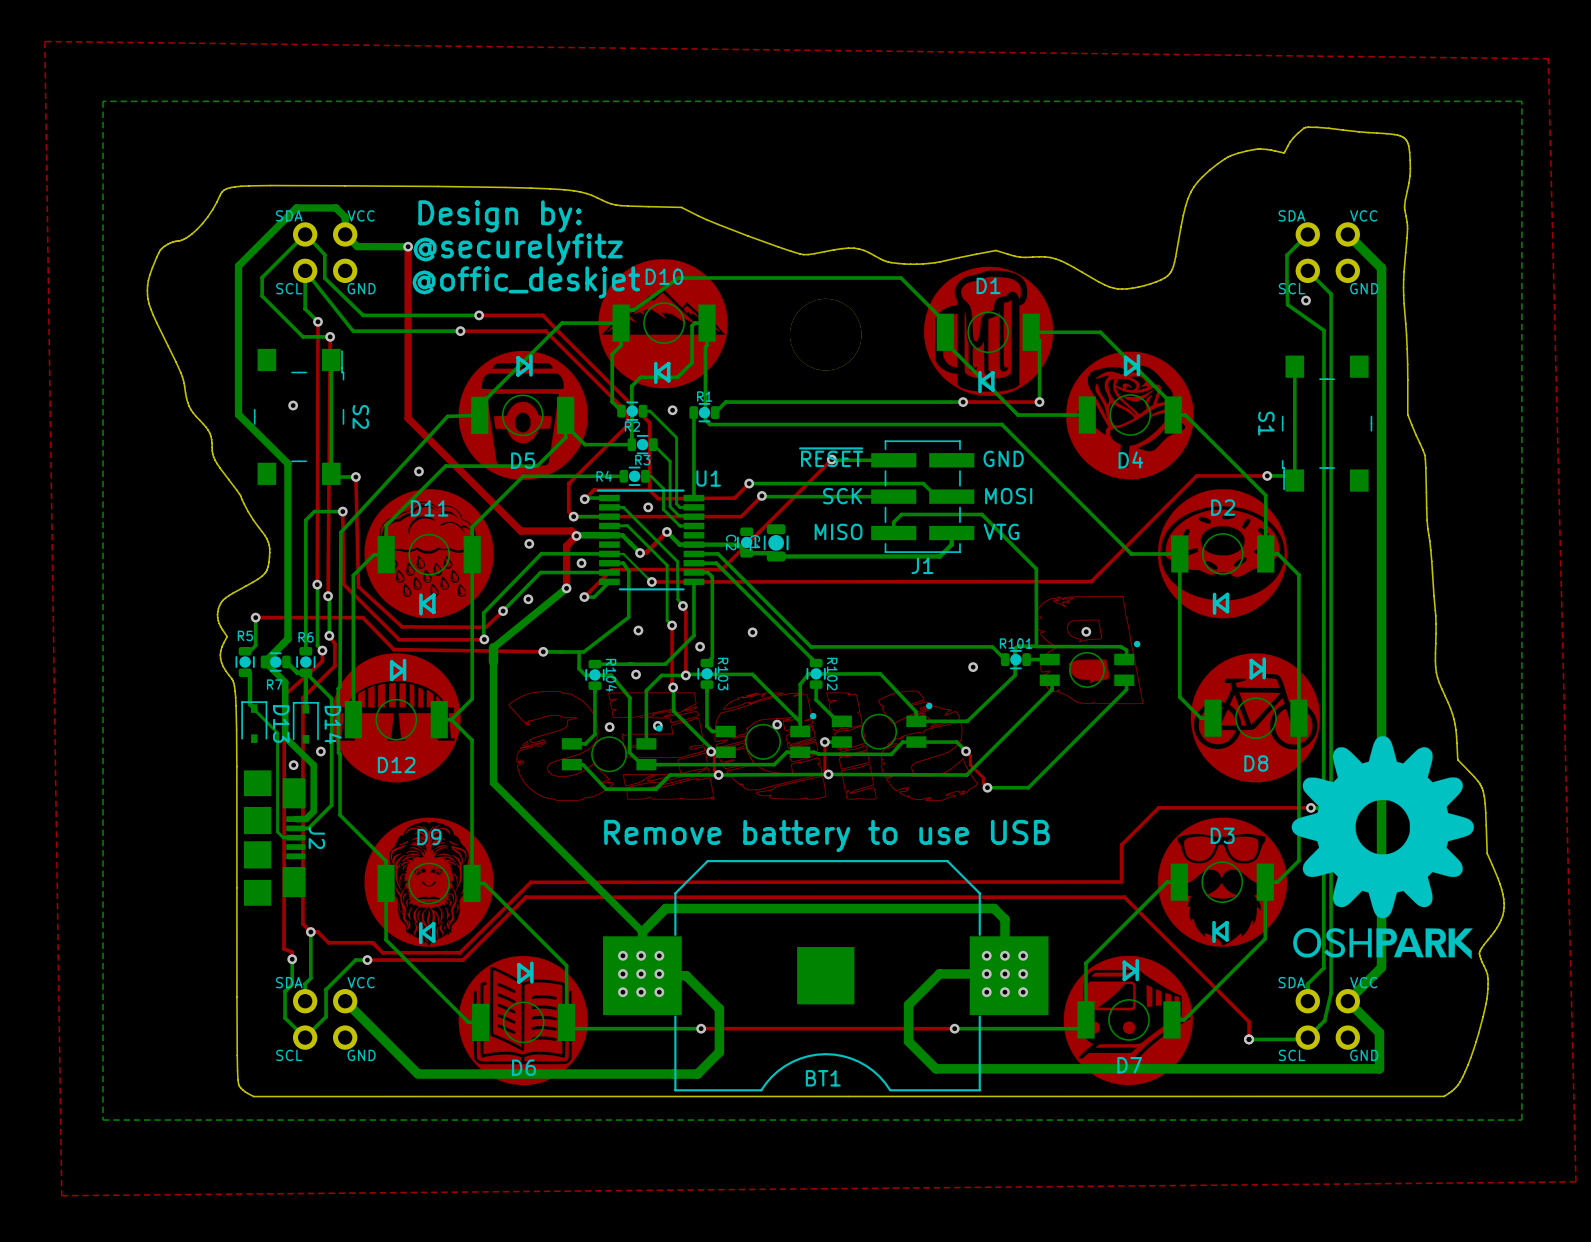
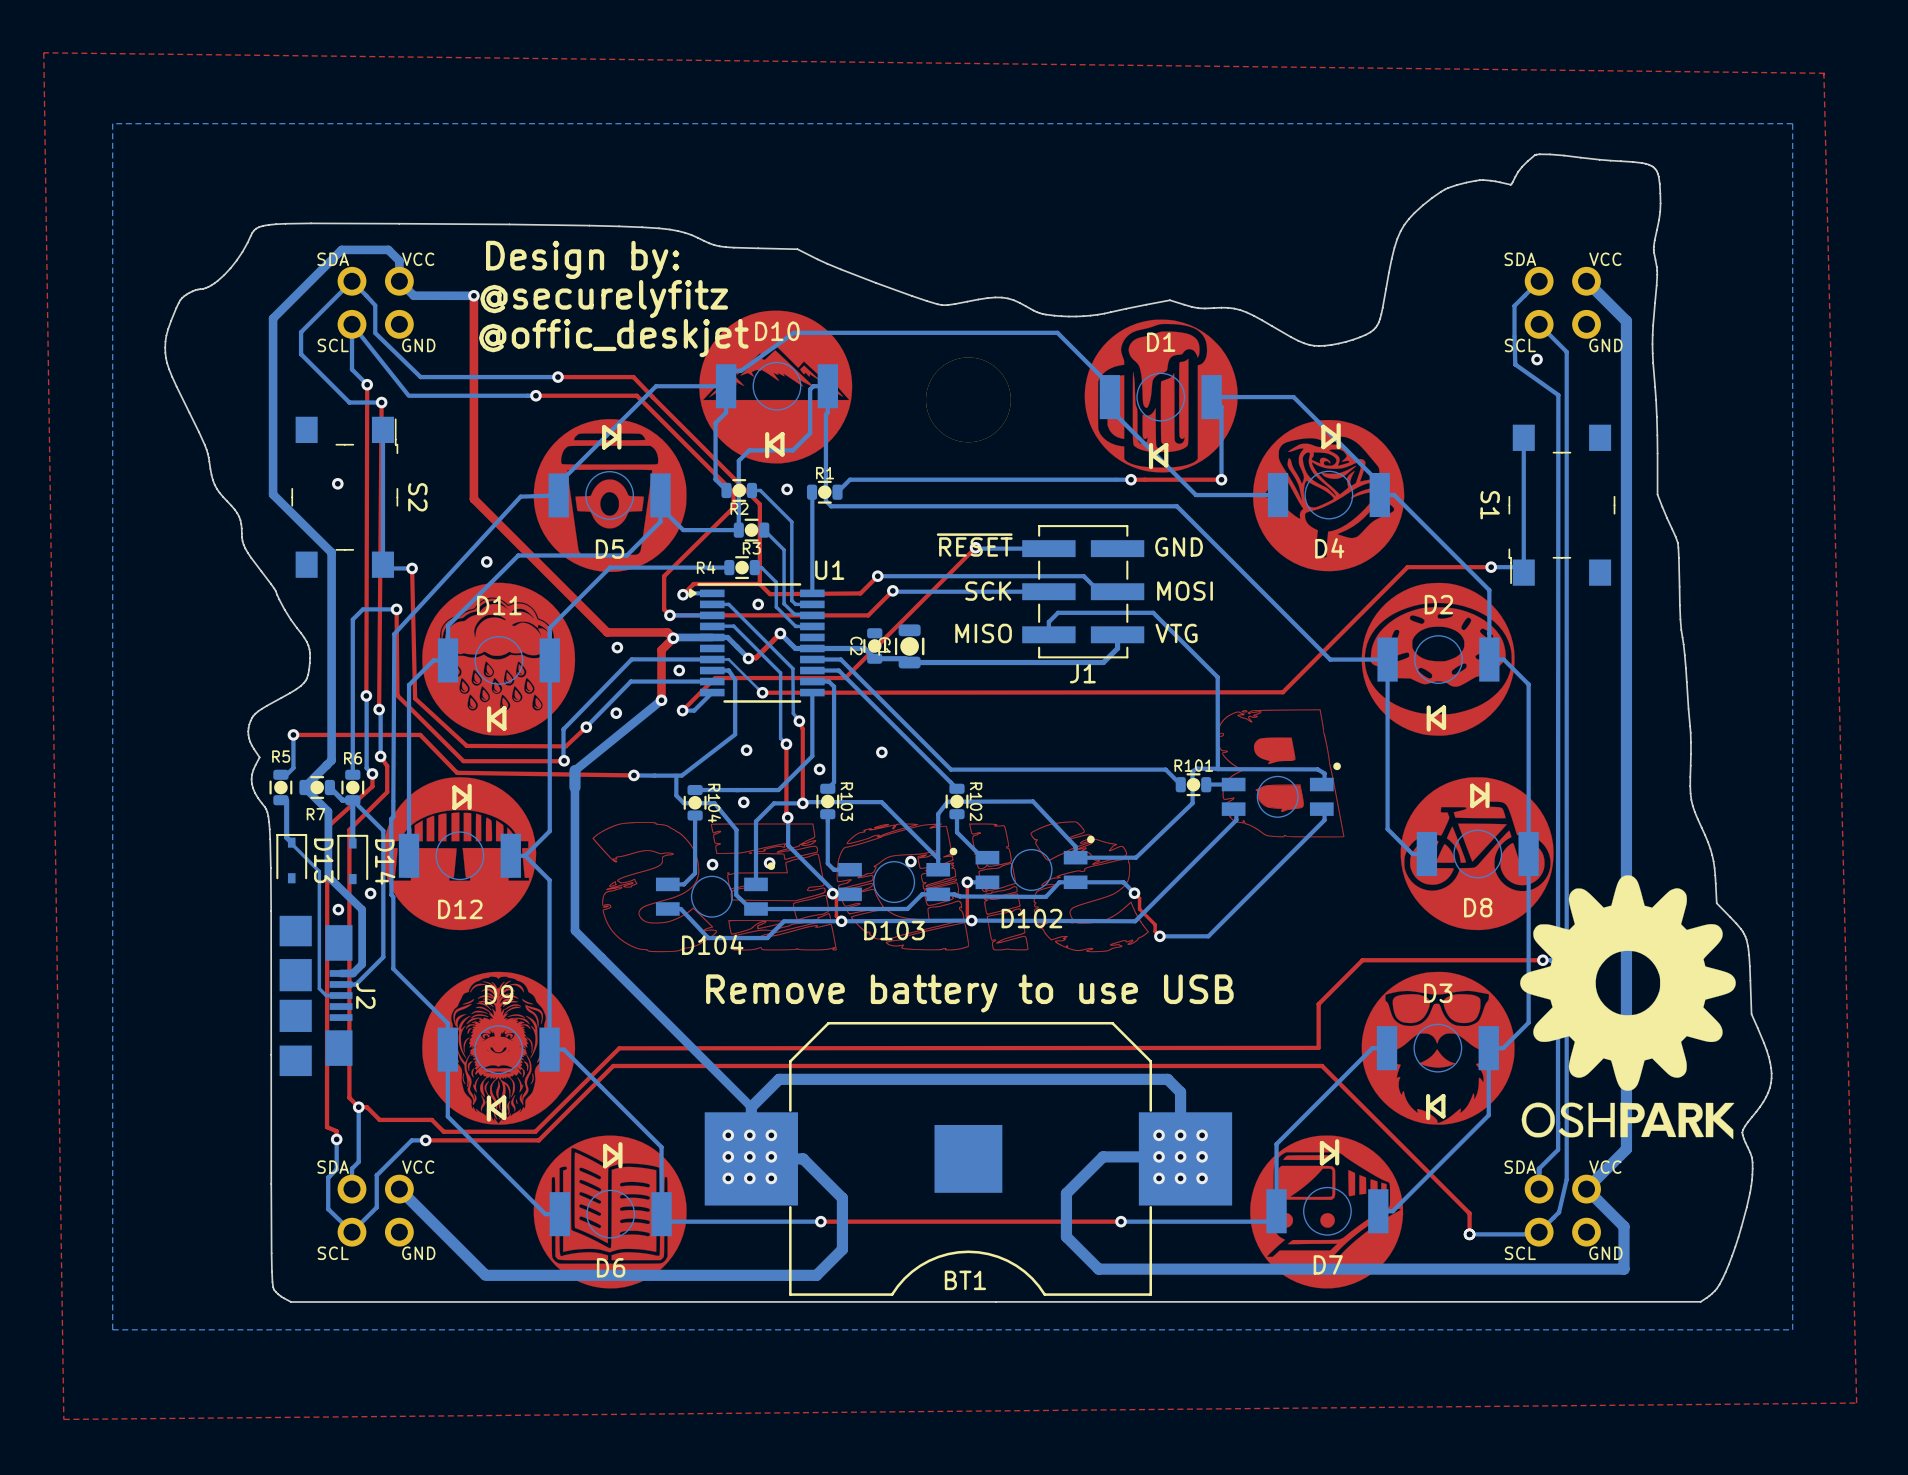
drawing shape: [331, 259, 1321, 1086] -> [383, 310, 1554, 1289]
drawing: none -> [689, 588, 697, 598]
via: (1086, 631) -> none
via: (973, 667) -> none
D102 name: none -> D102 (1031, 918)
D103 name: none -> D103 (894, 930)
D104 name: none -> D104 (712, 944)

